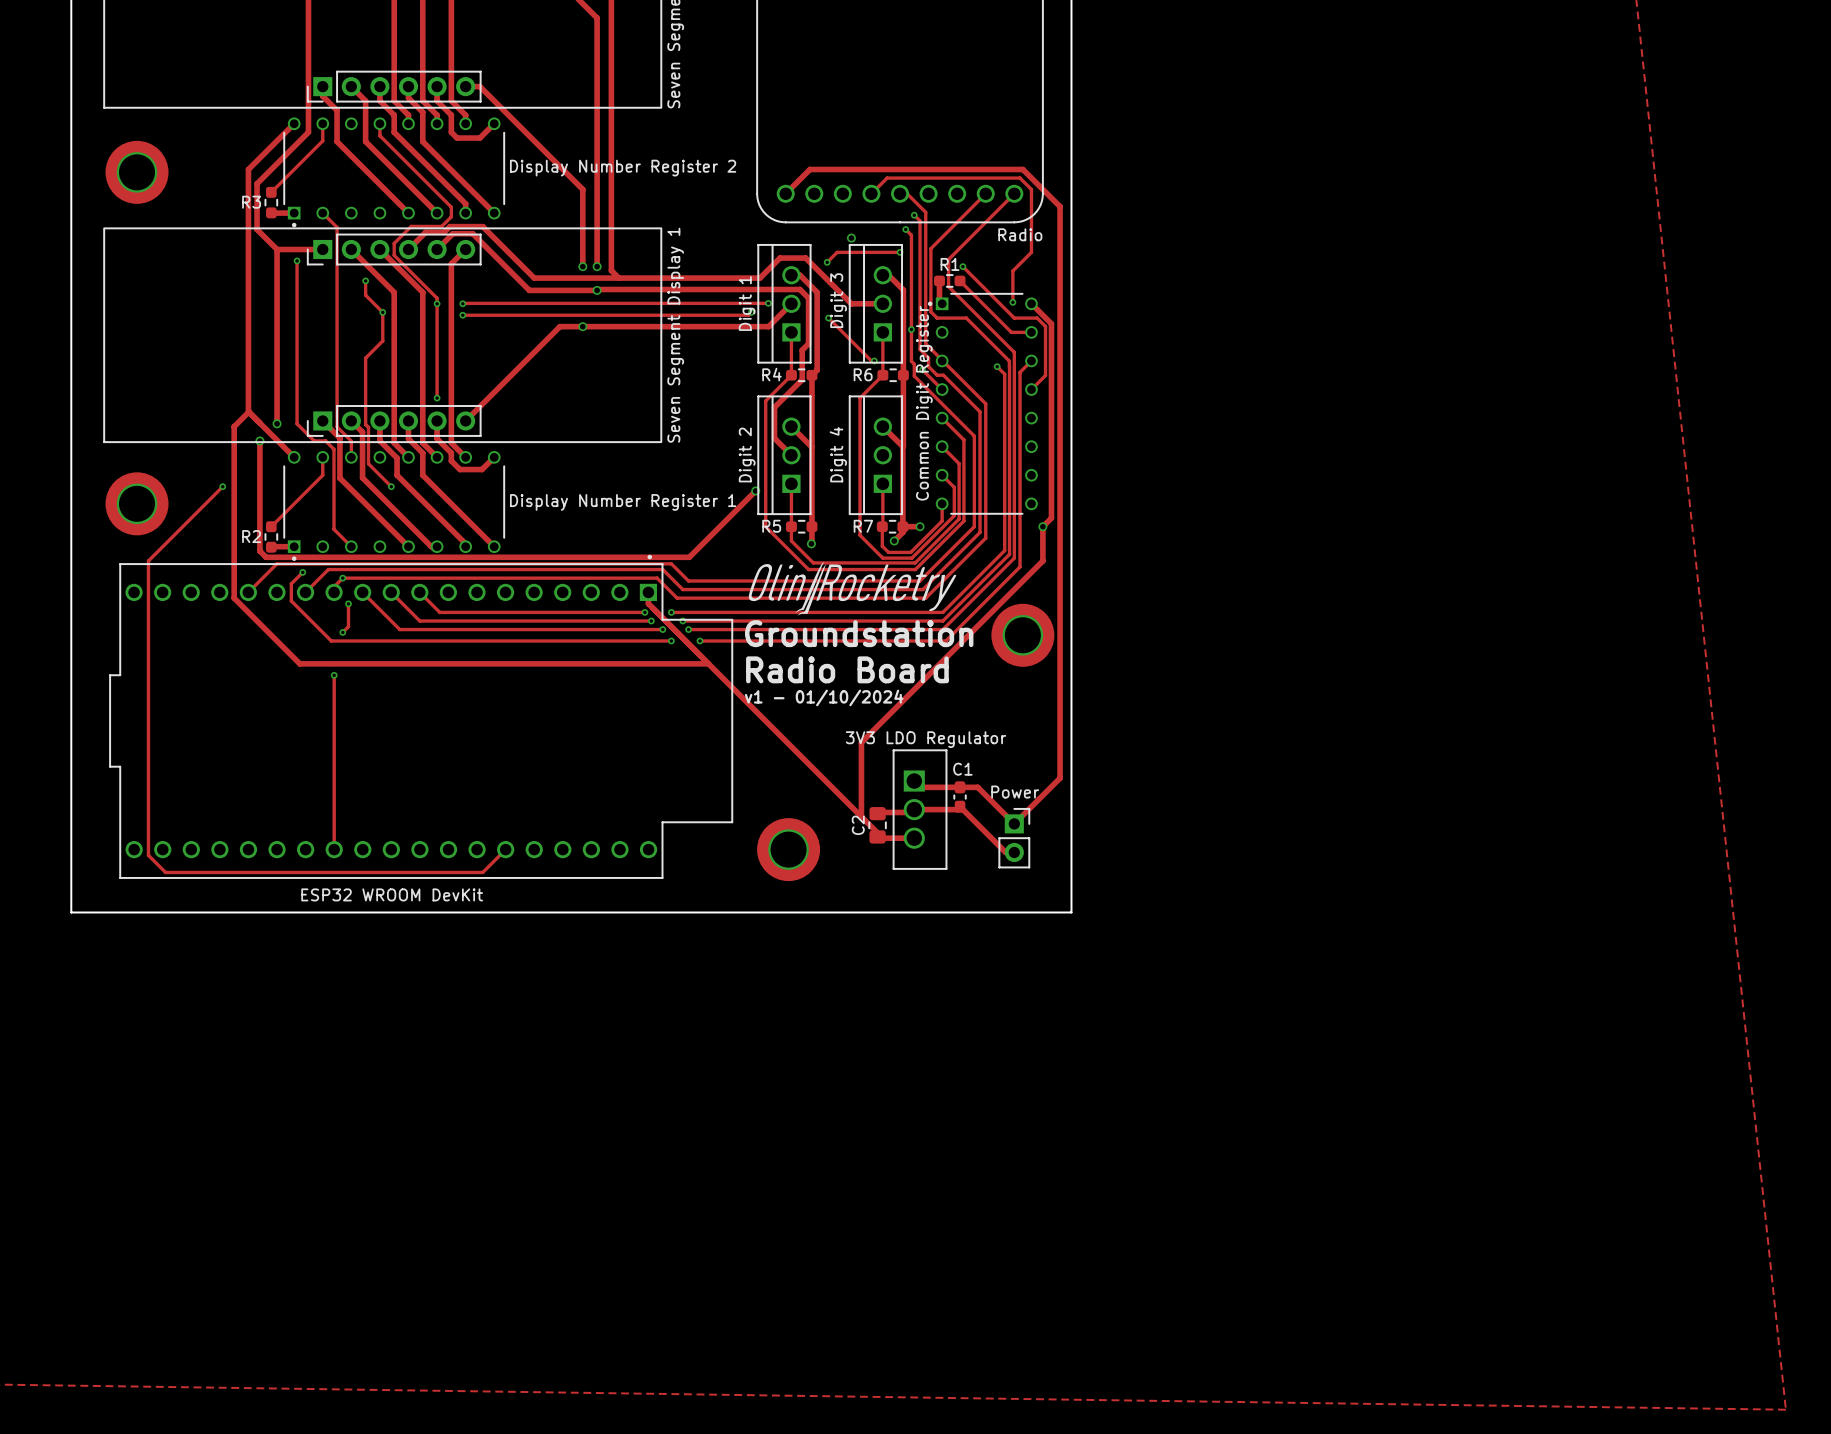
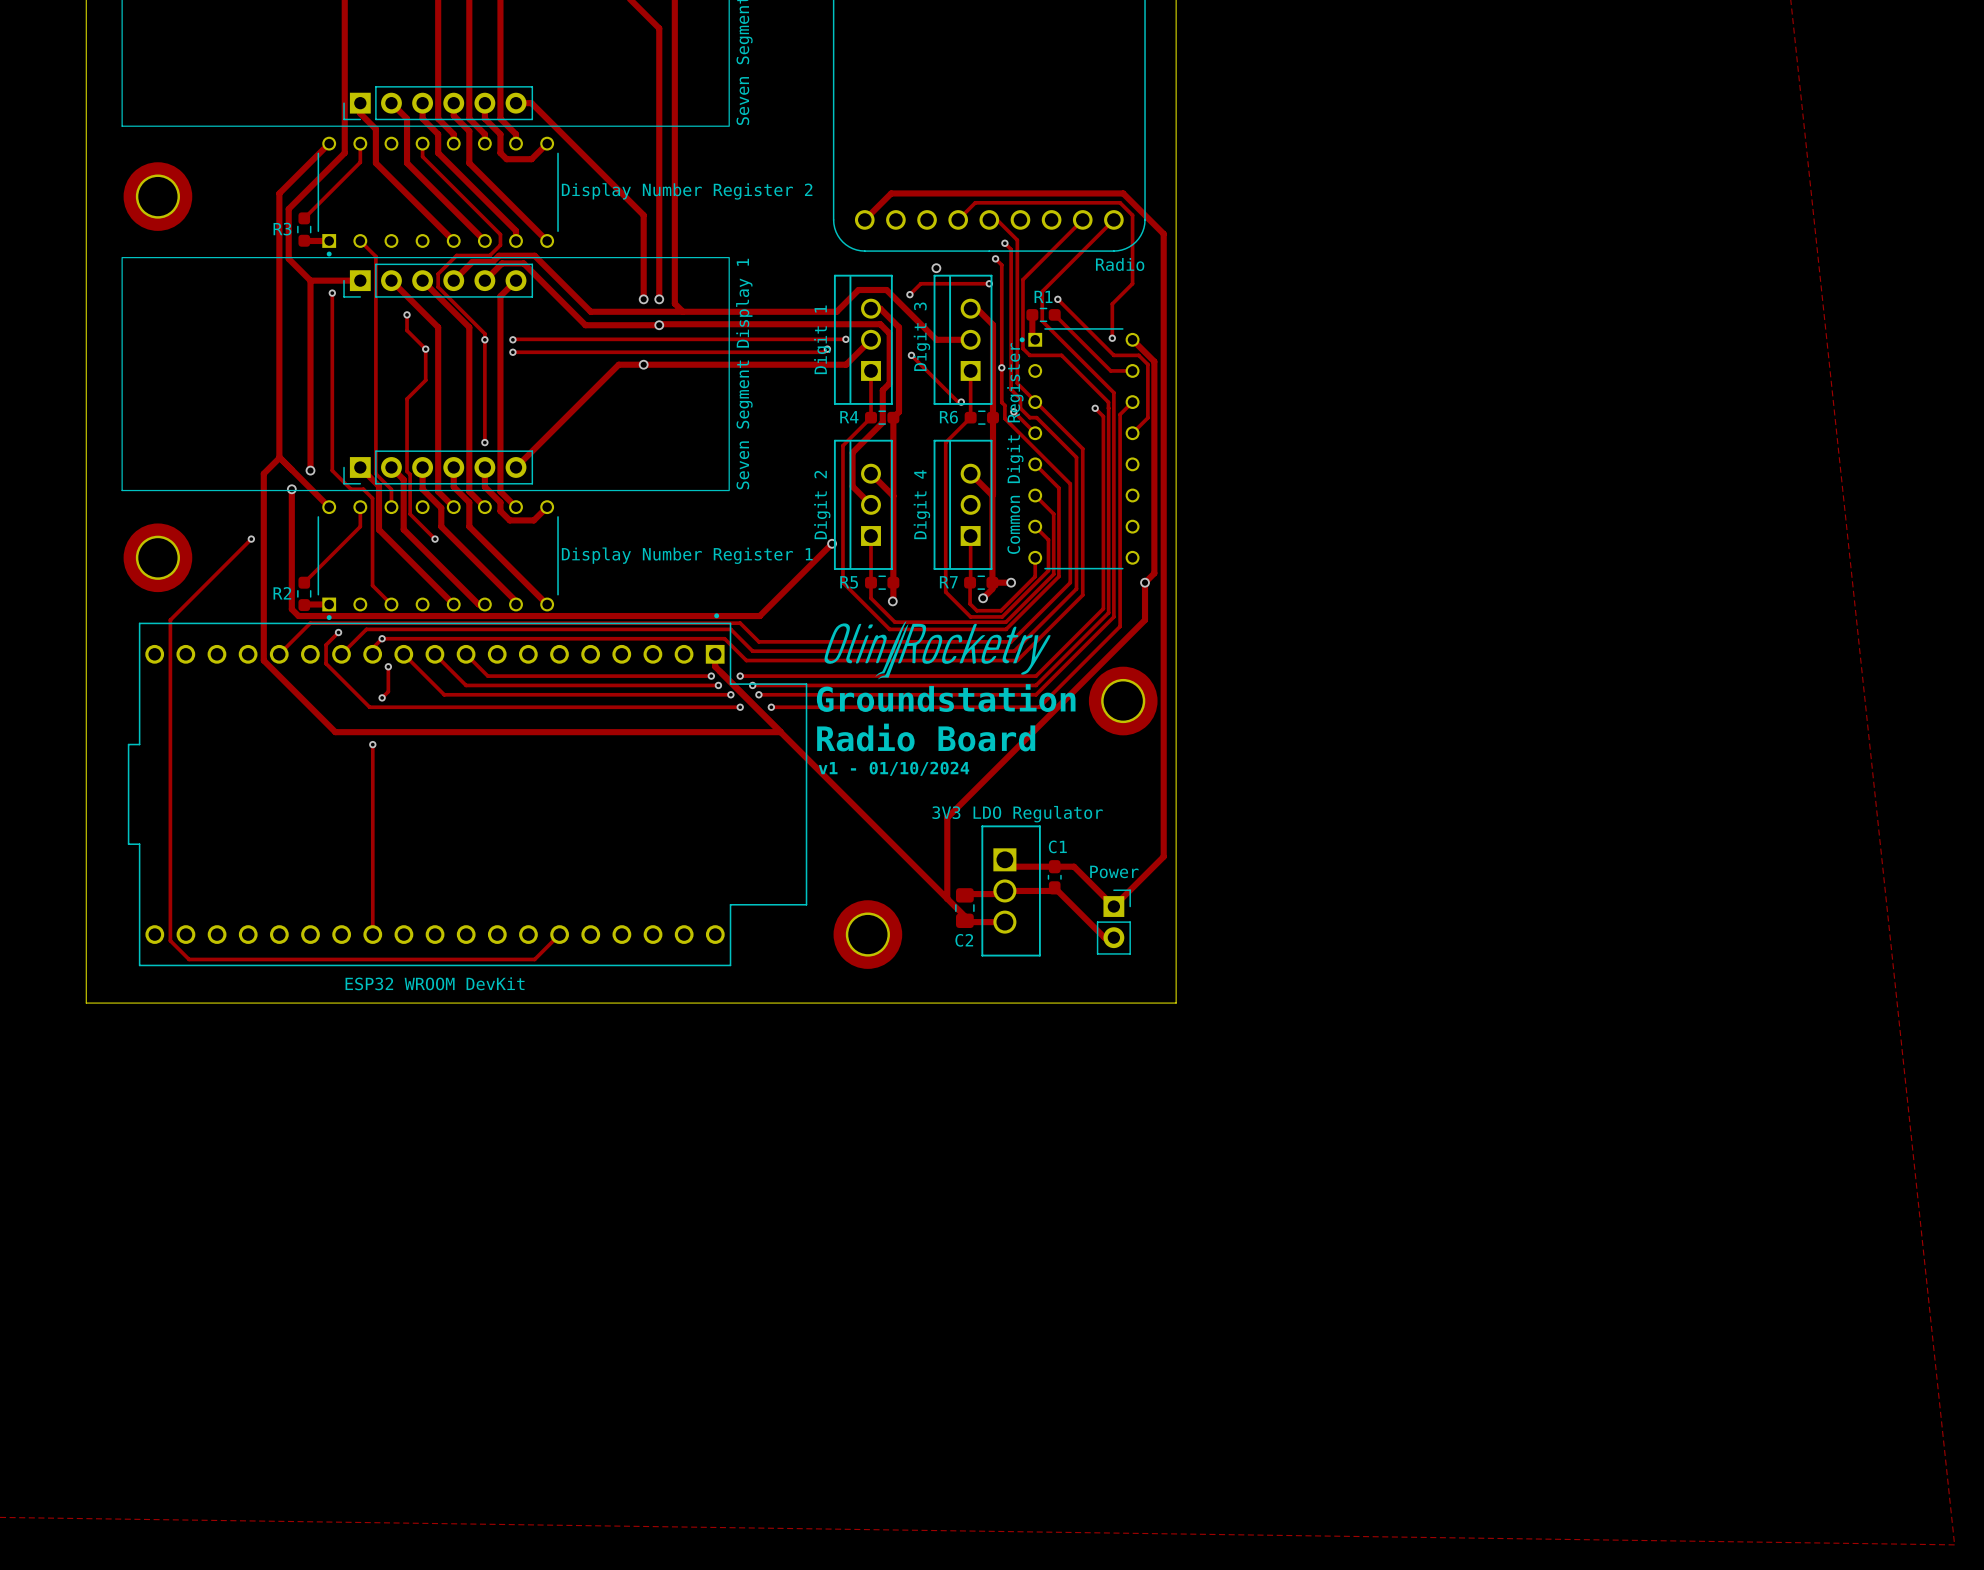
C2 name rotation: 0° (858, 825) -> 90° clockwise (964, 940)
C2 name position: C2 (858, 825) -> C2 (964, 940)

